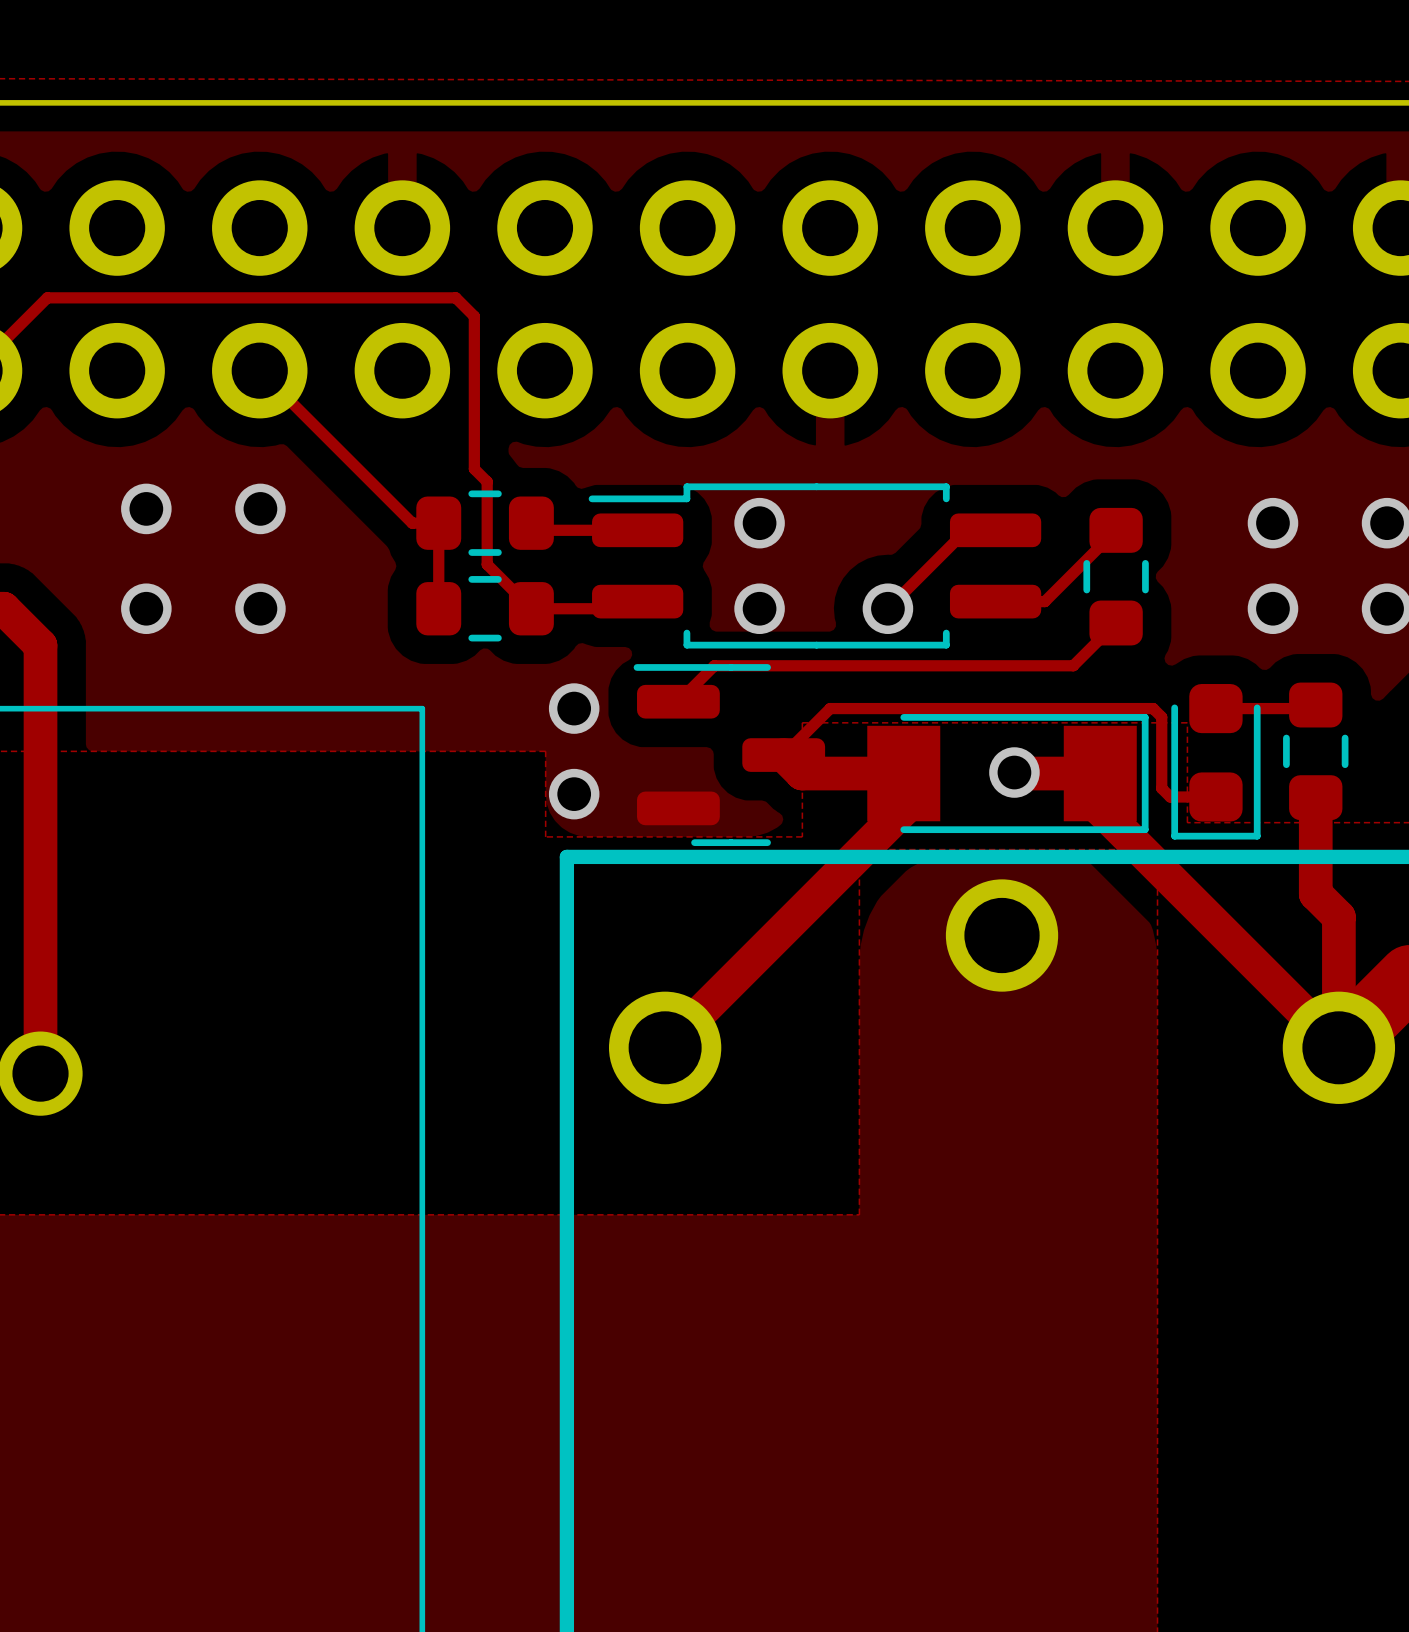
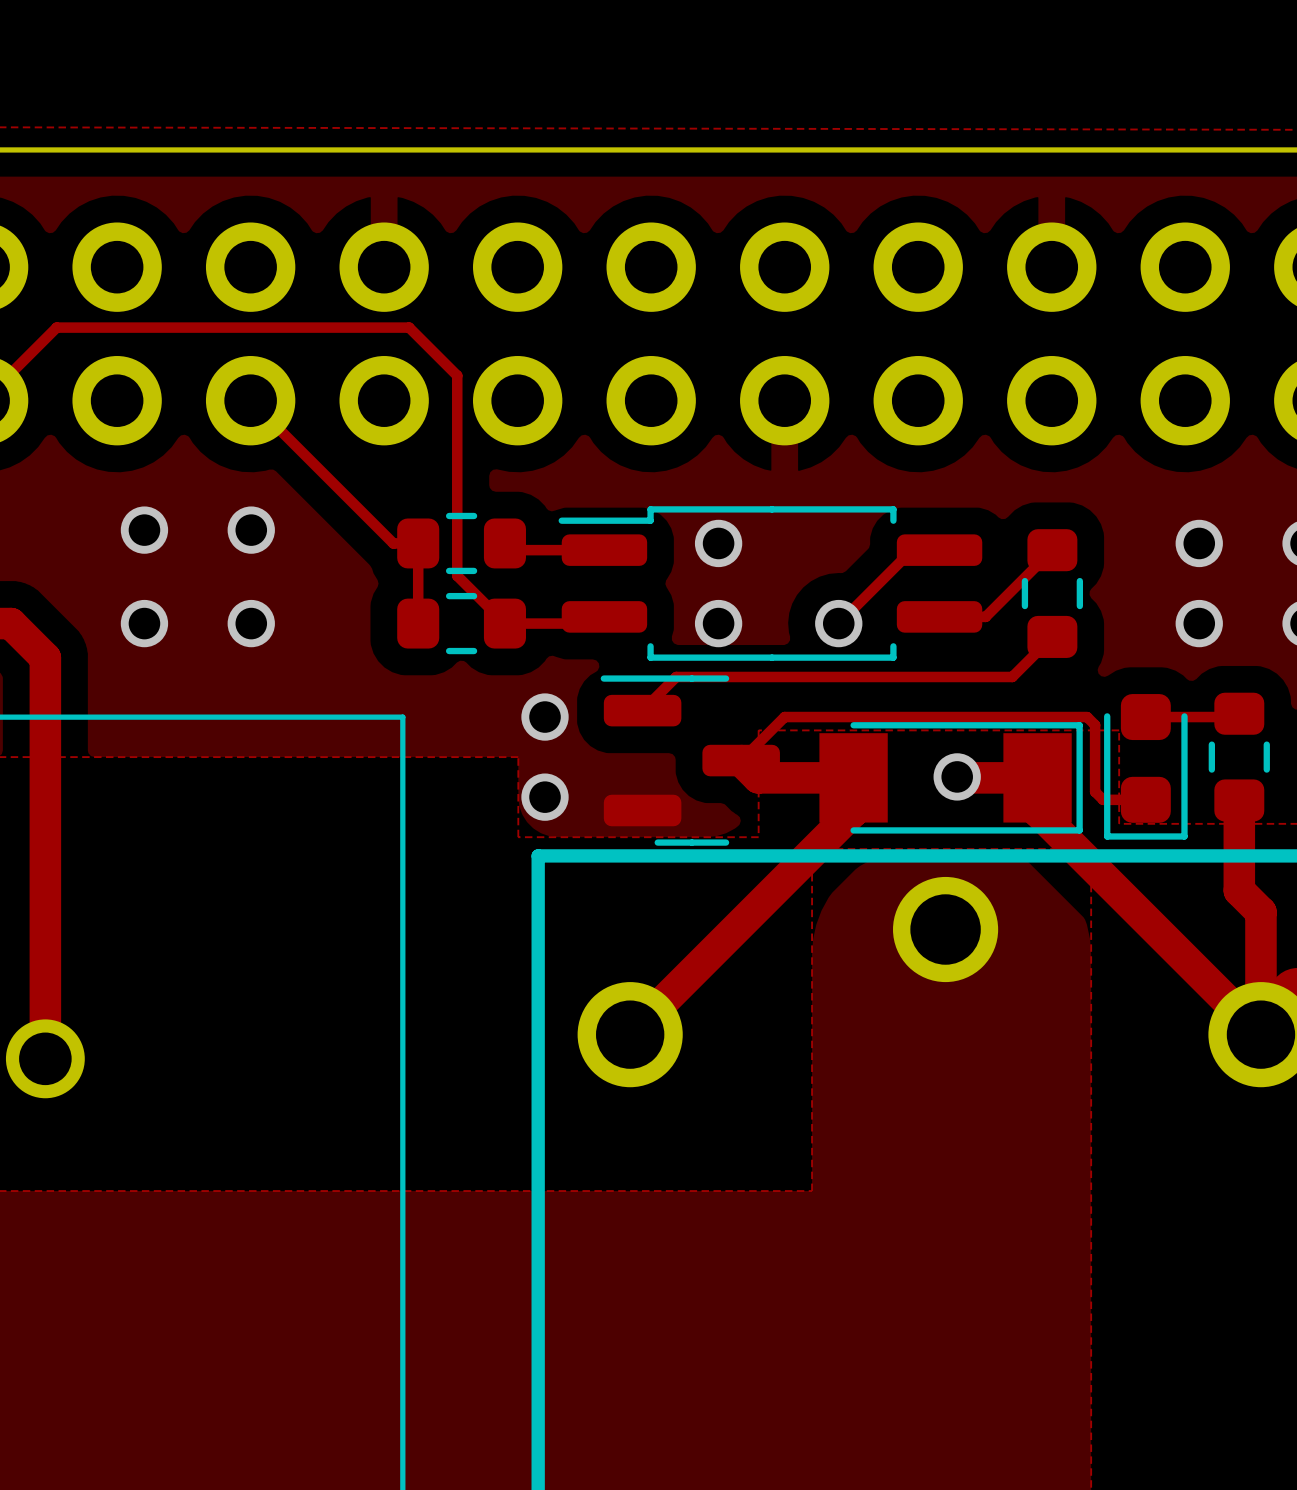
track: (47, 297) (455, 297) (474, 316) (474, 468) (487, 481) (487, 564) -> (51, 332) (56, 327) (409, 327) (457, 375) (457, 575) (463, 582)

